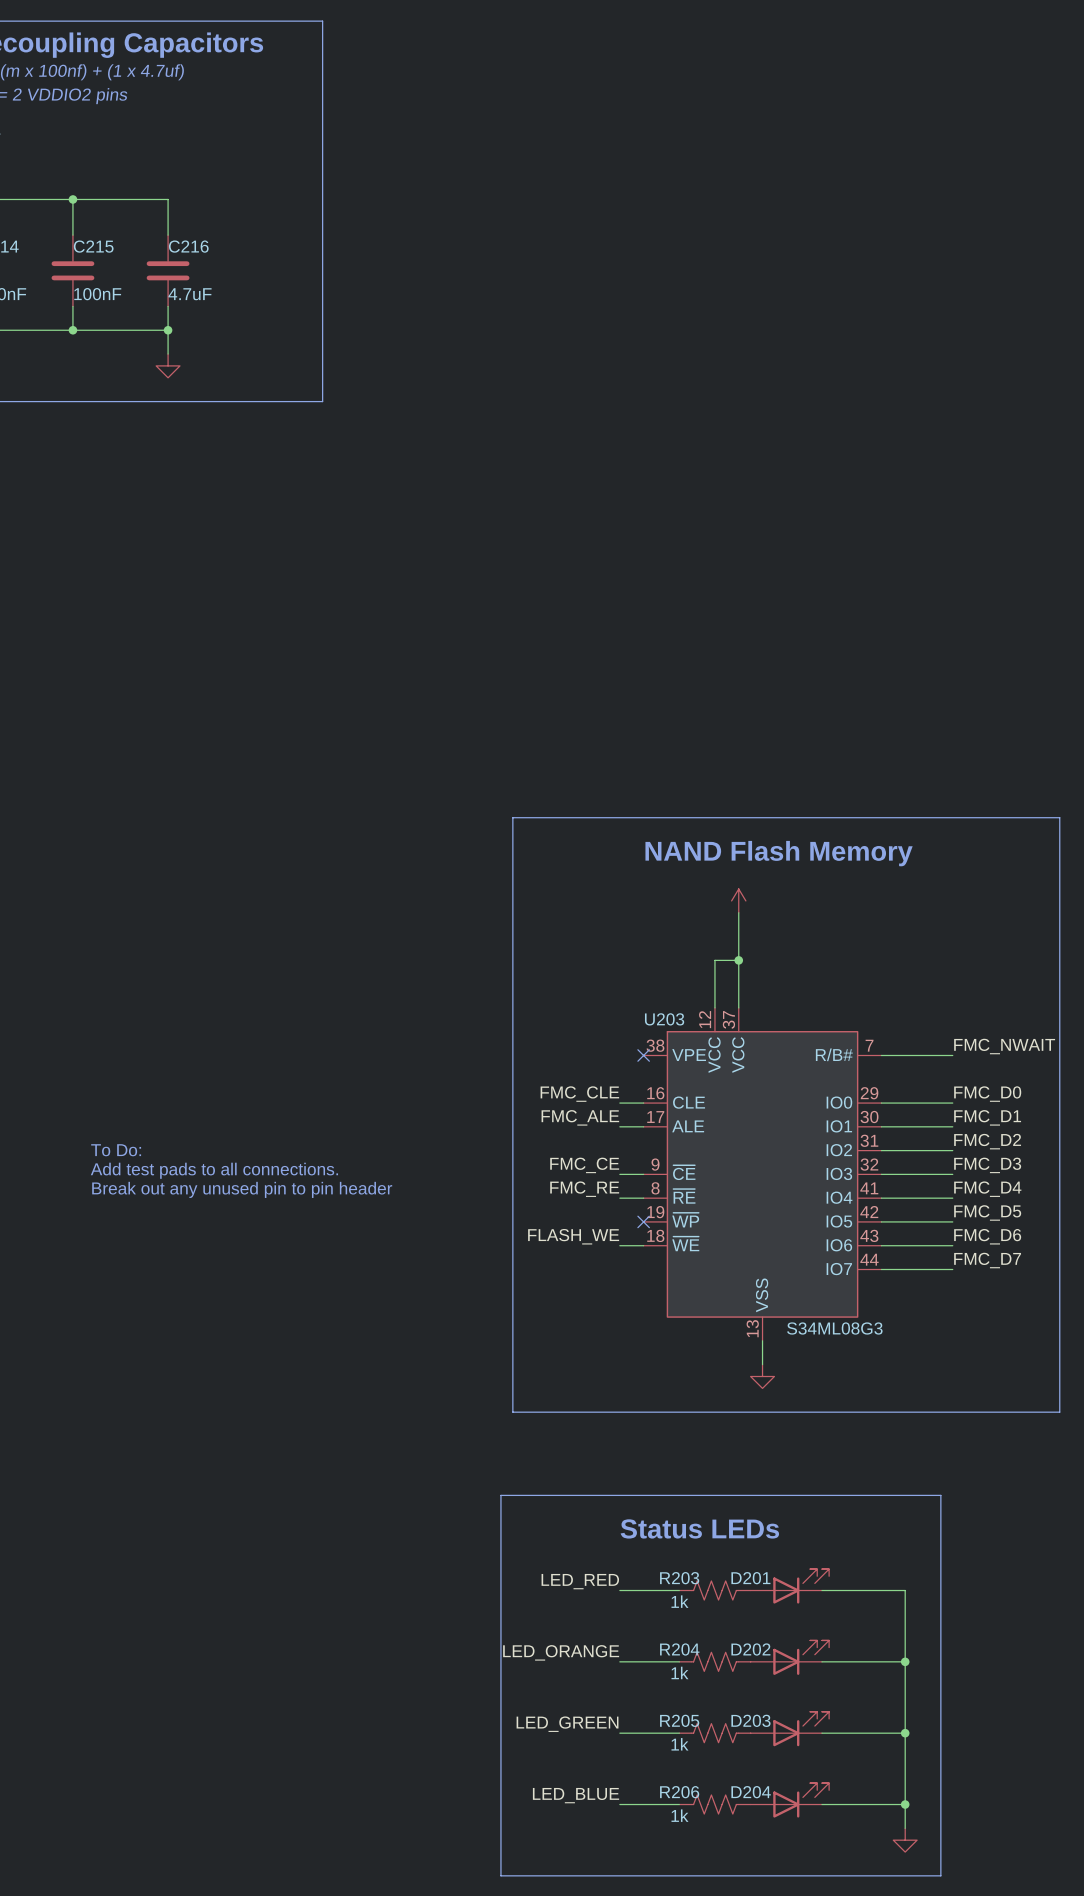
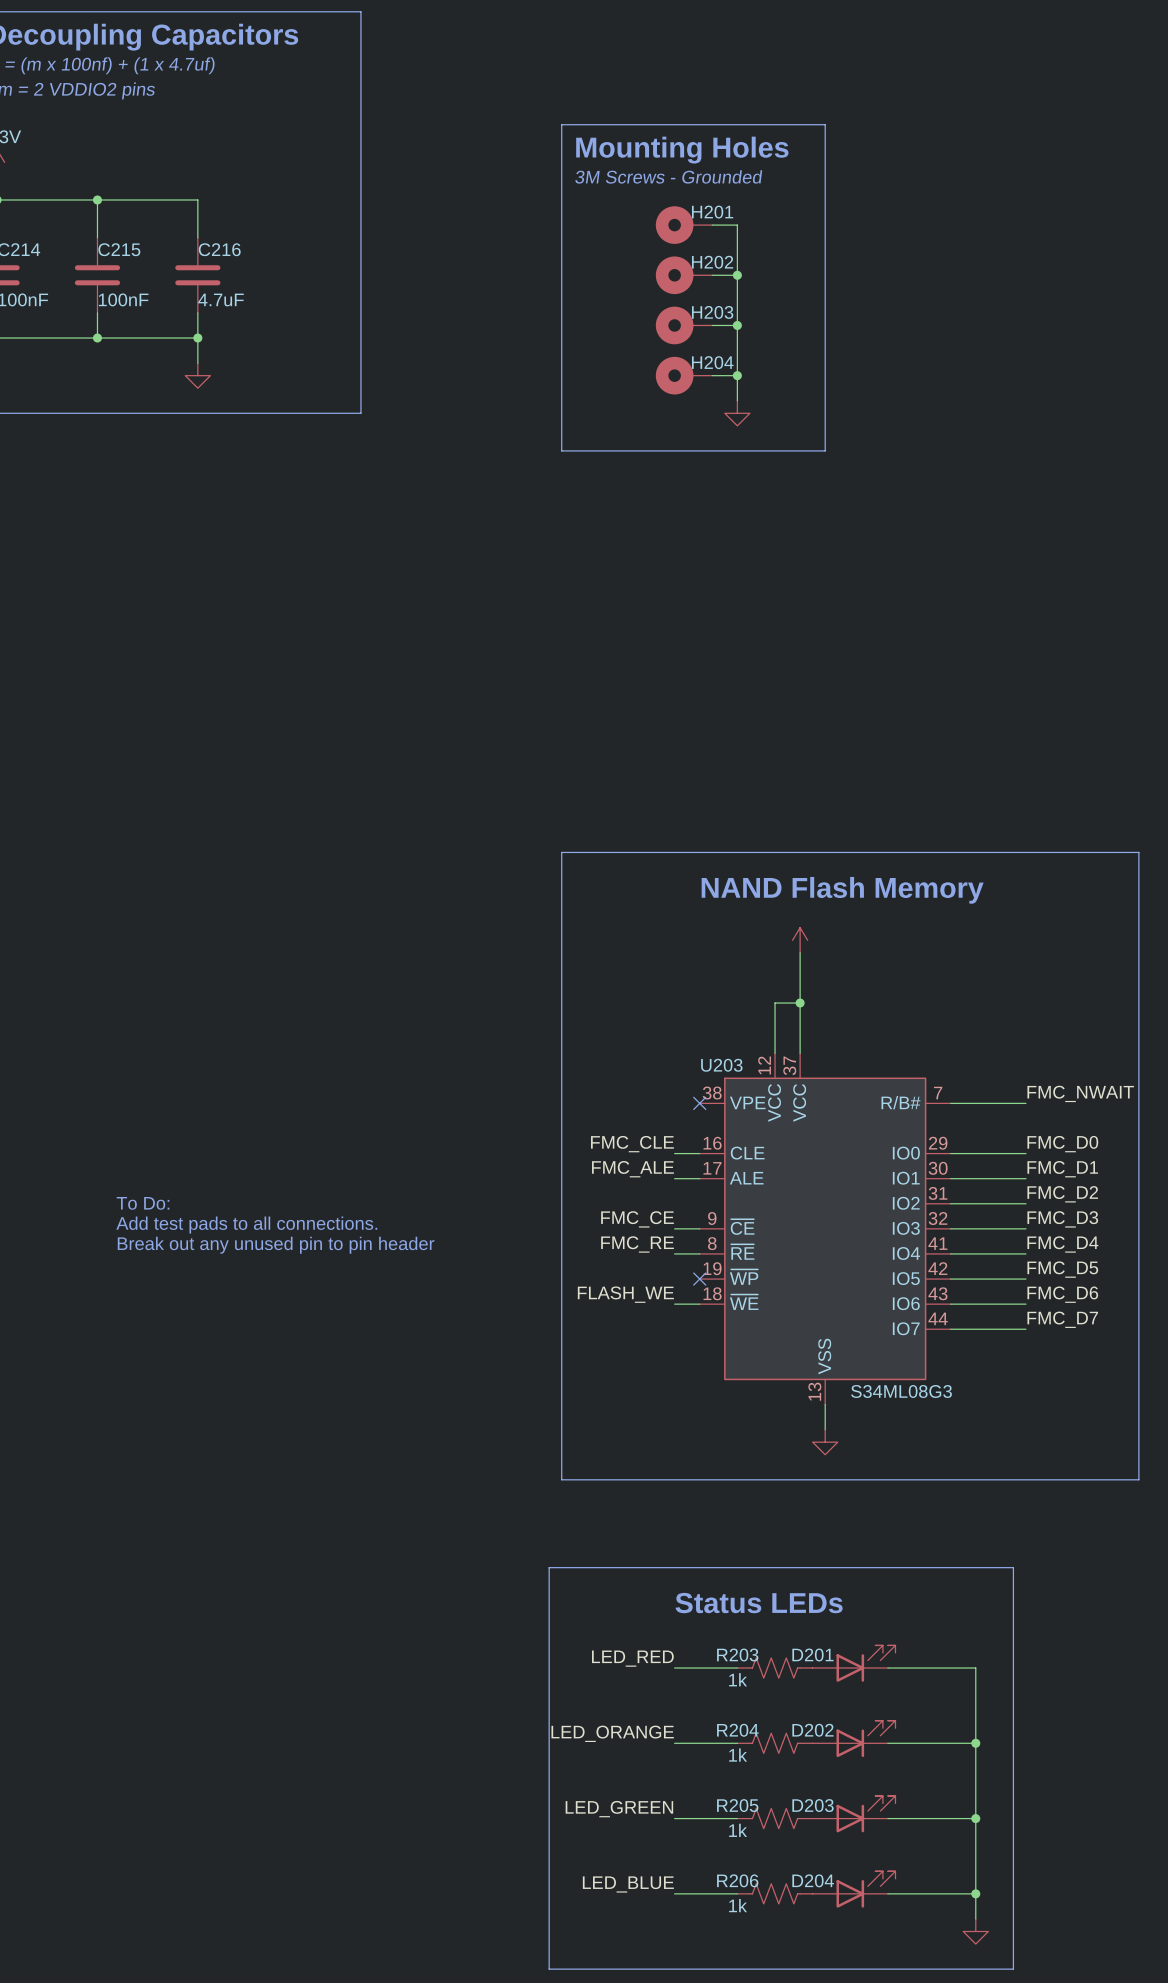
line: none -> (561, 124) (825, 124) (825, 450) (561, 450) (561, 124)
text: none -> Mounting Holes (682, 150)
text: none -> 3M Screws - Grounded (668, 176)
H201: none -> (684, 225)
wire: none -> (712, 225) (737, 225) (737, 400)
H202: none -> (684, 275)
wire: none -> (712, 275) (737, 275)
junction: none -> (737, 275)
H203: none -> (684, 325)
wire: none -> (712, 325) (737, 325)
junction: none -> (737, 325)
H204: none -> (684, 375)
wire: none -> (712, 375) (737, 375)
junction: none -> (737, 375)
power symbol: none -> (737, 413)

